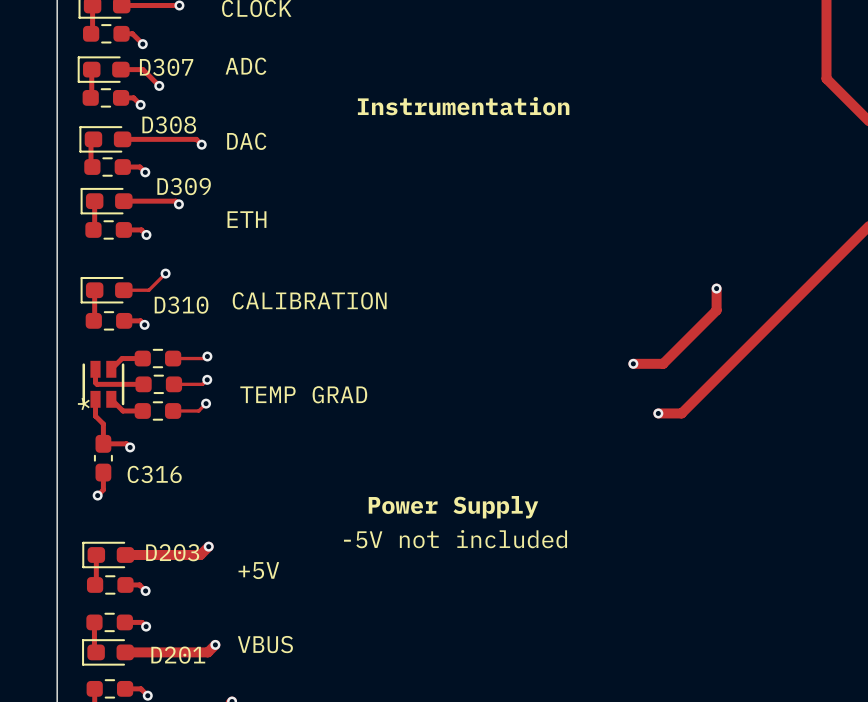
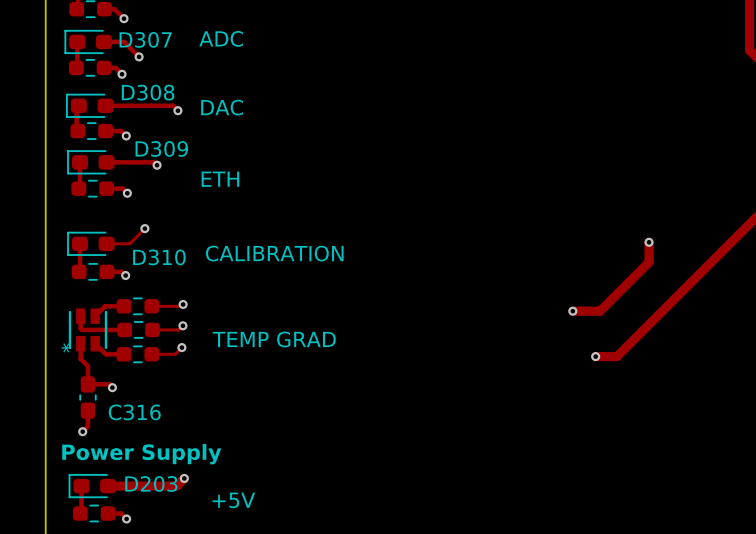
text: Instrumentation (463, 106) -> none
text position: Power Supply (453, 507) -> Power Supply (141, 454)
text: -5V not included (455, 539) -> none

